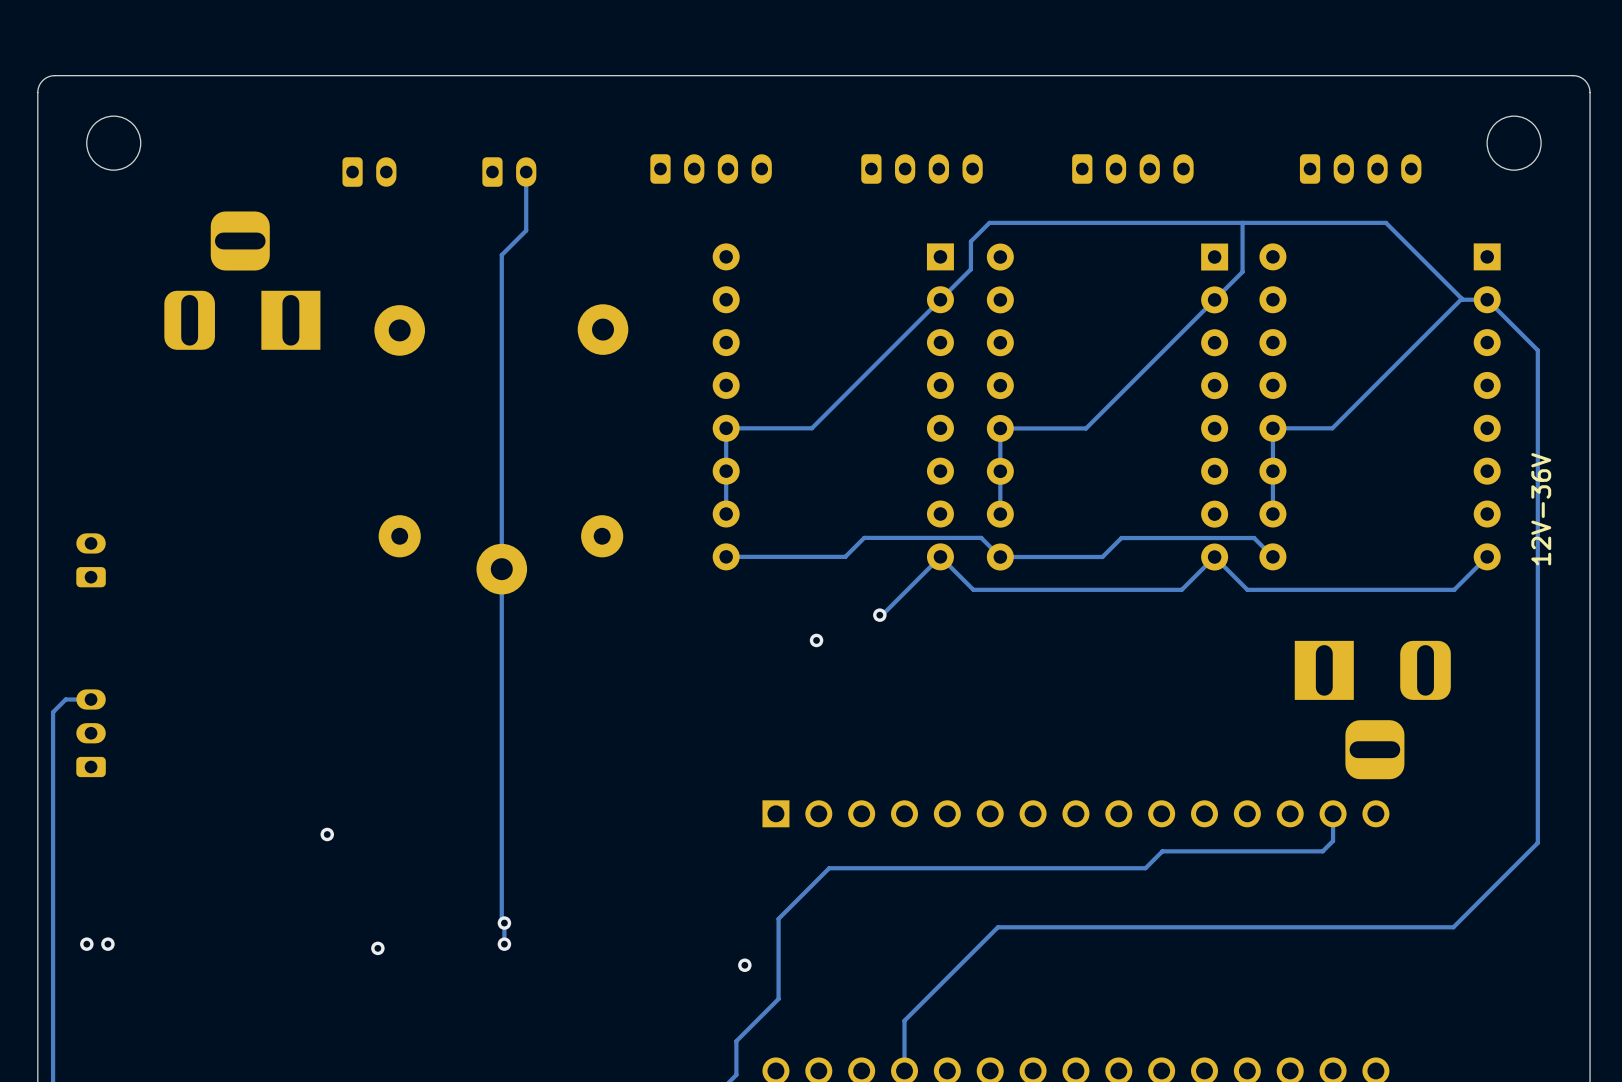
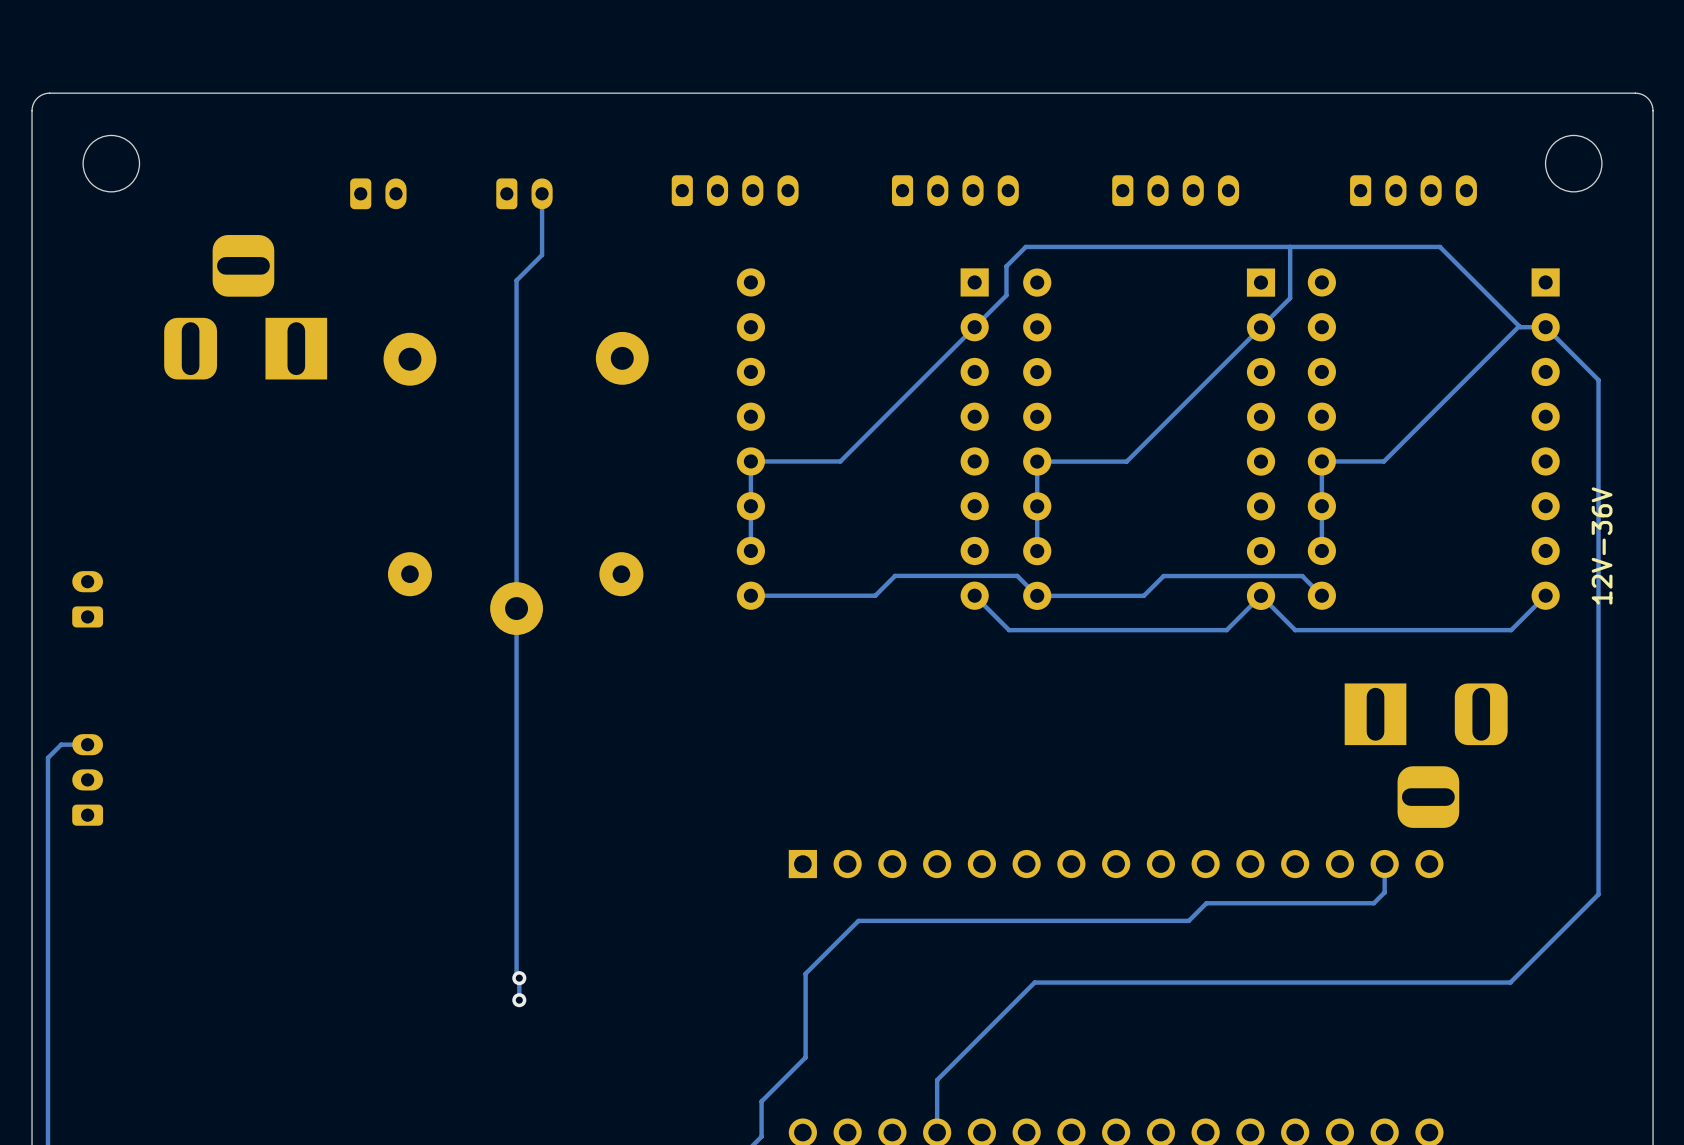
track: (940, 556) (882, 615) (879, 615) -> none
via: (879, 615) -> none
via: (816, 640) -> none
via: (327, 834) -> none
via: (86, 944) -> none
via: (107, 944) -> none
via: (377, 948) -> none
via: (744, 965) -> none

